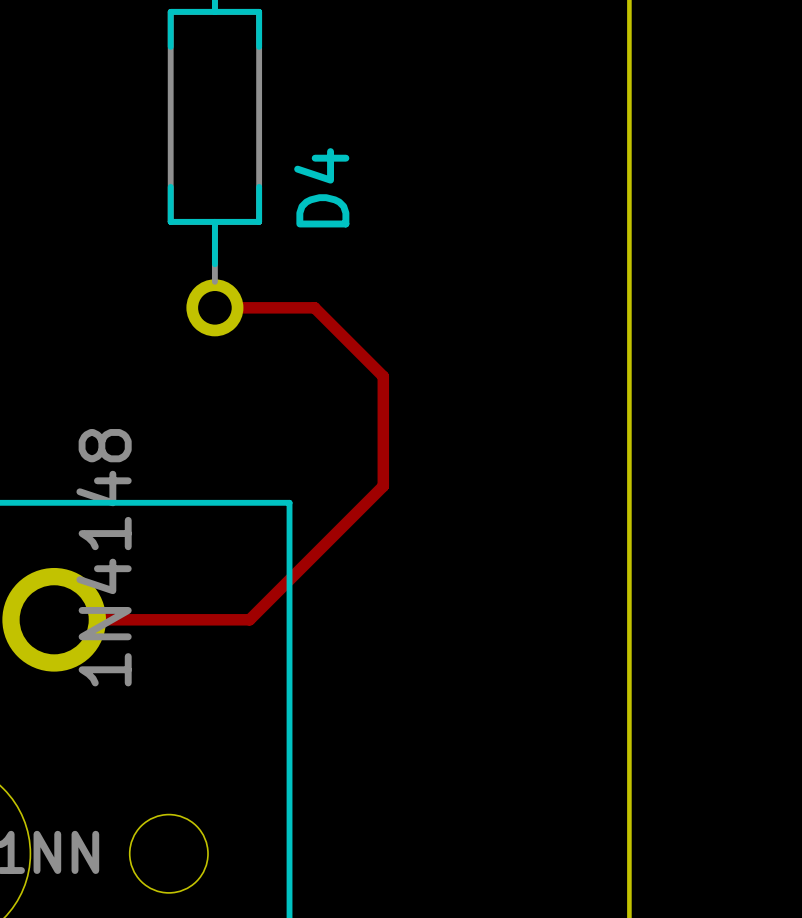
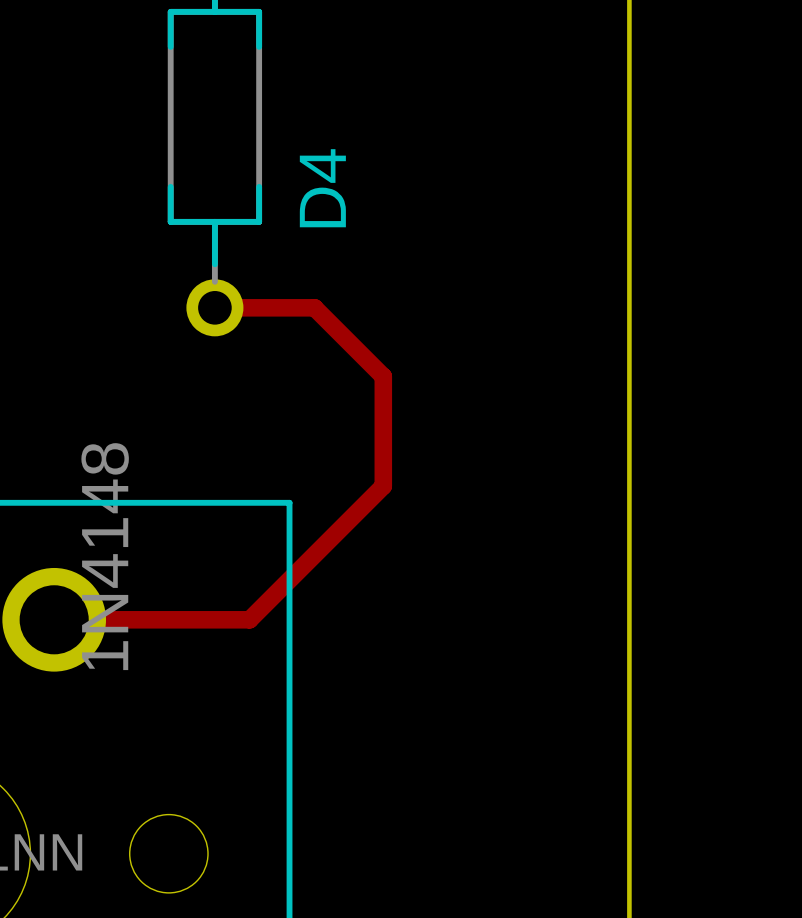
top track width: thin (214, 307) (314, 307) (383, 376) (383, 486) (249, 619) (54, 619) -> thick (214, 307) (314, 307) (383, 376) (383, 486) (249, 619) (54, 619)

